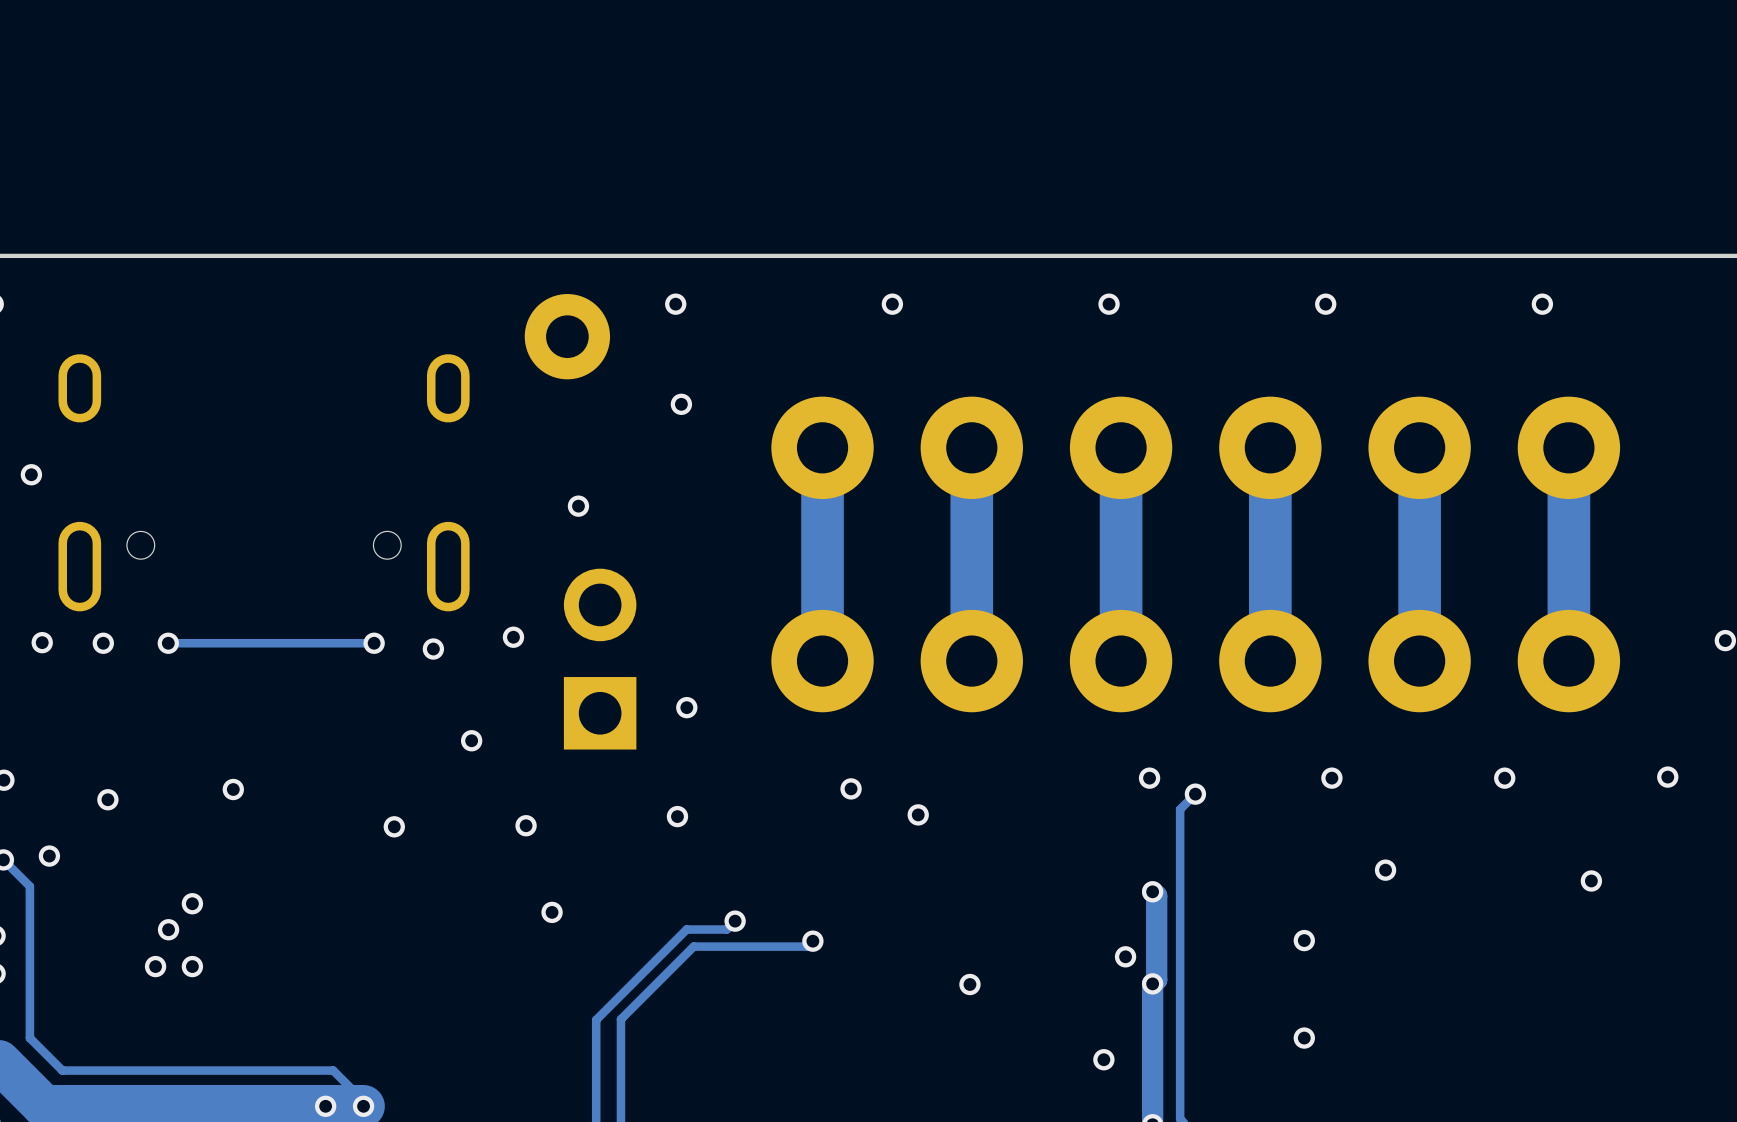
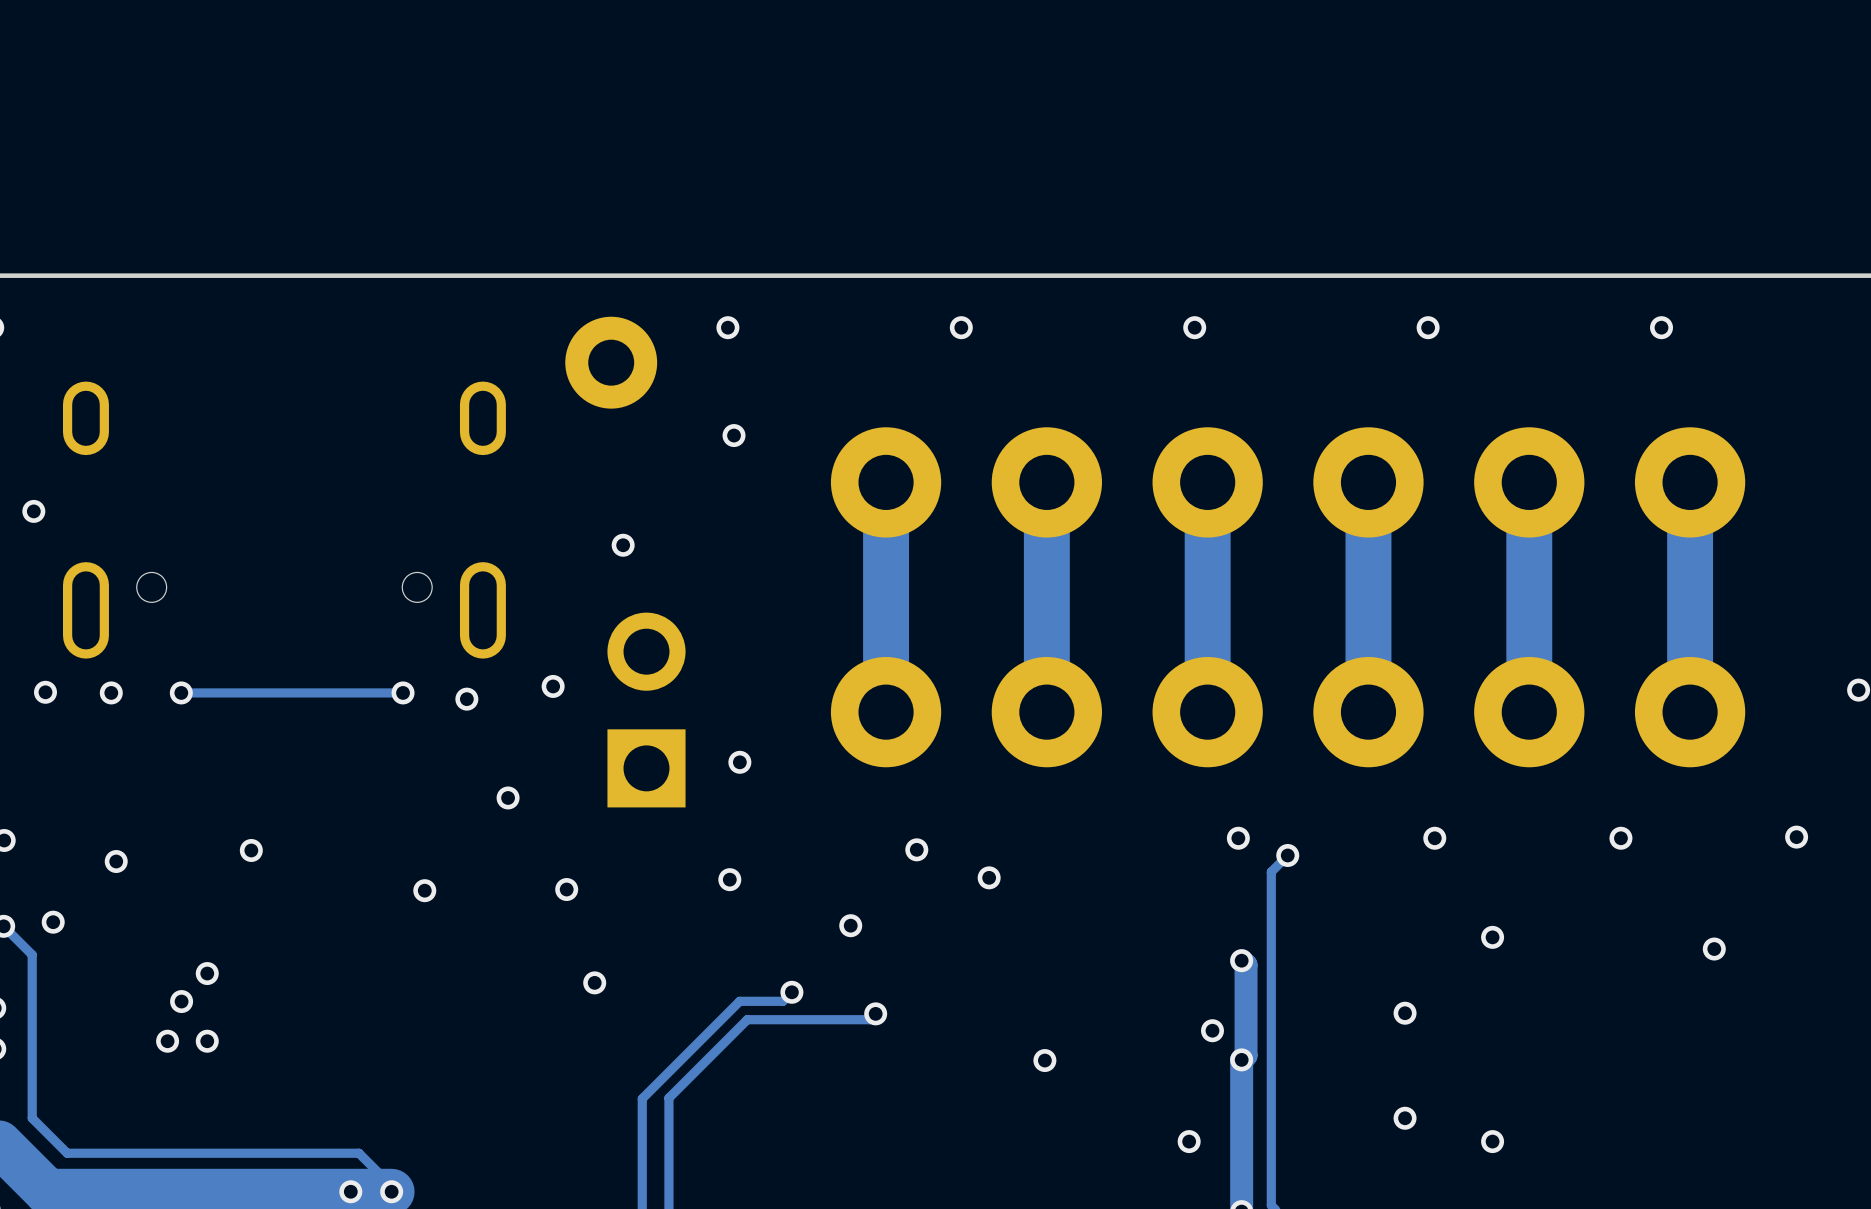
via: none -> (850, 925)
via: none -> (1492, 1141)

